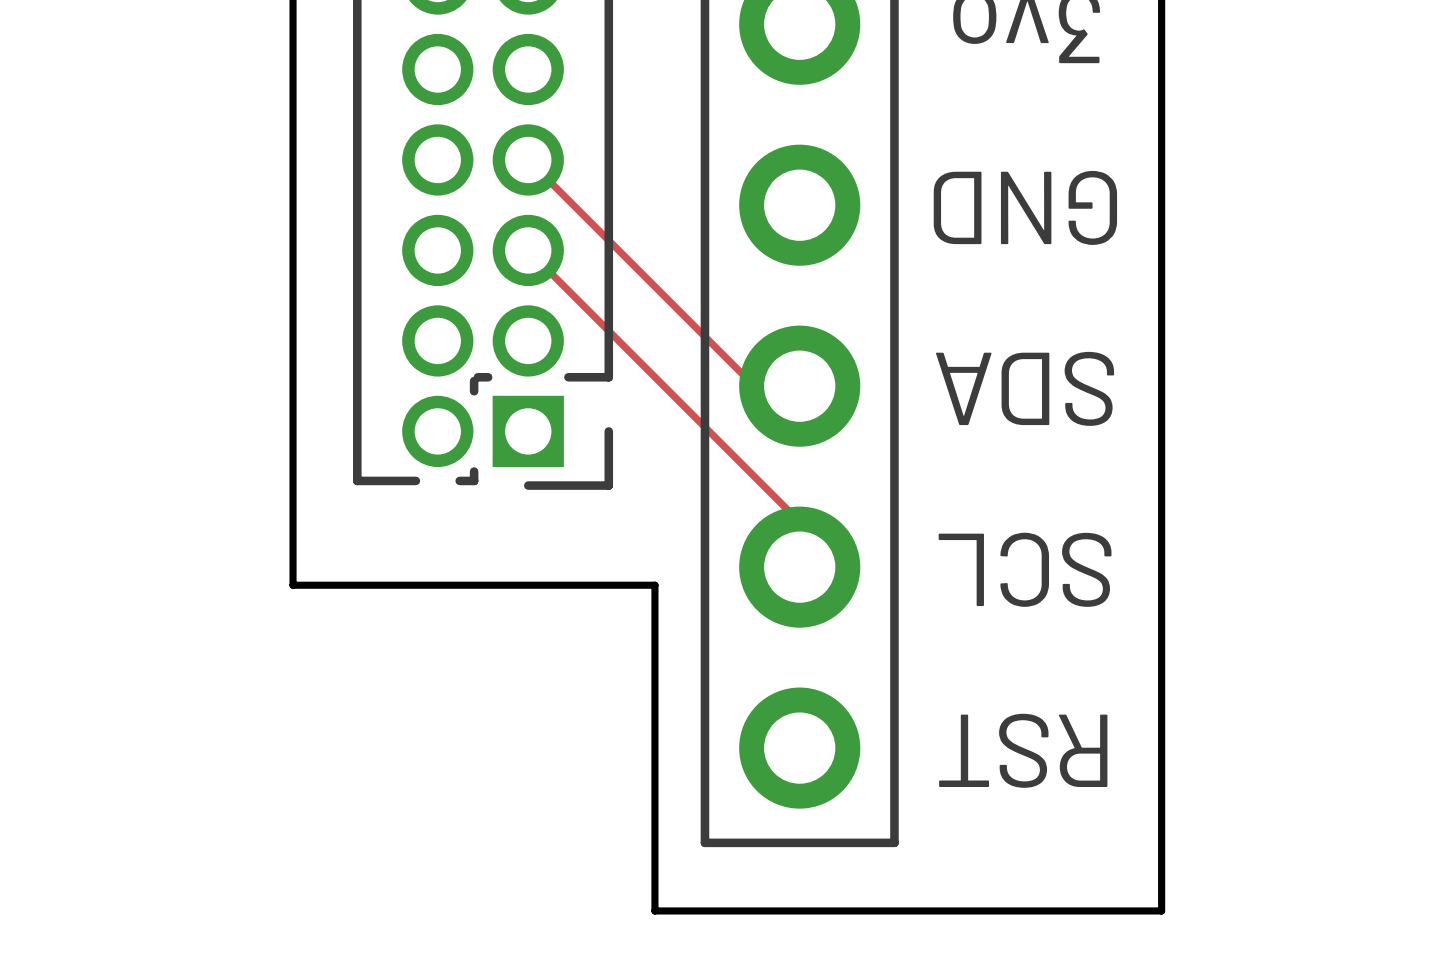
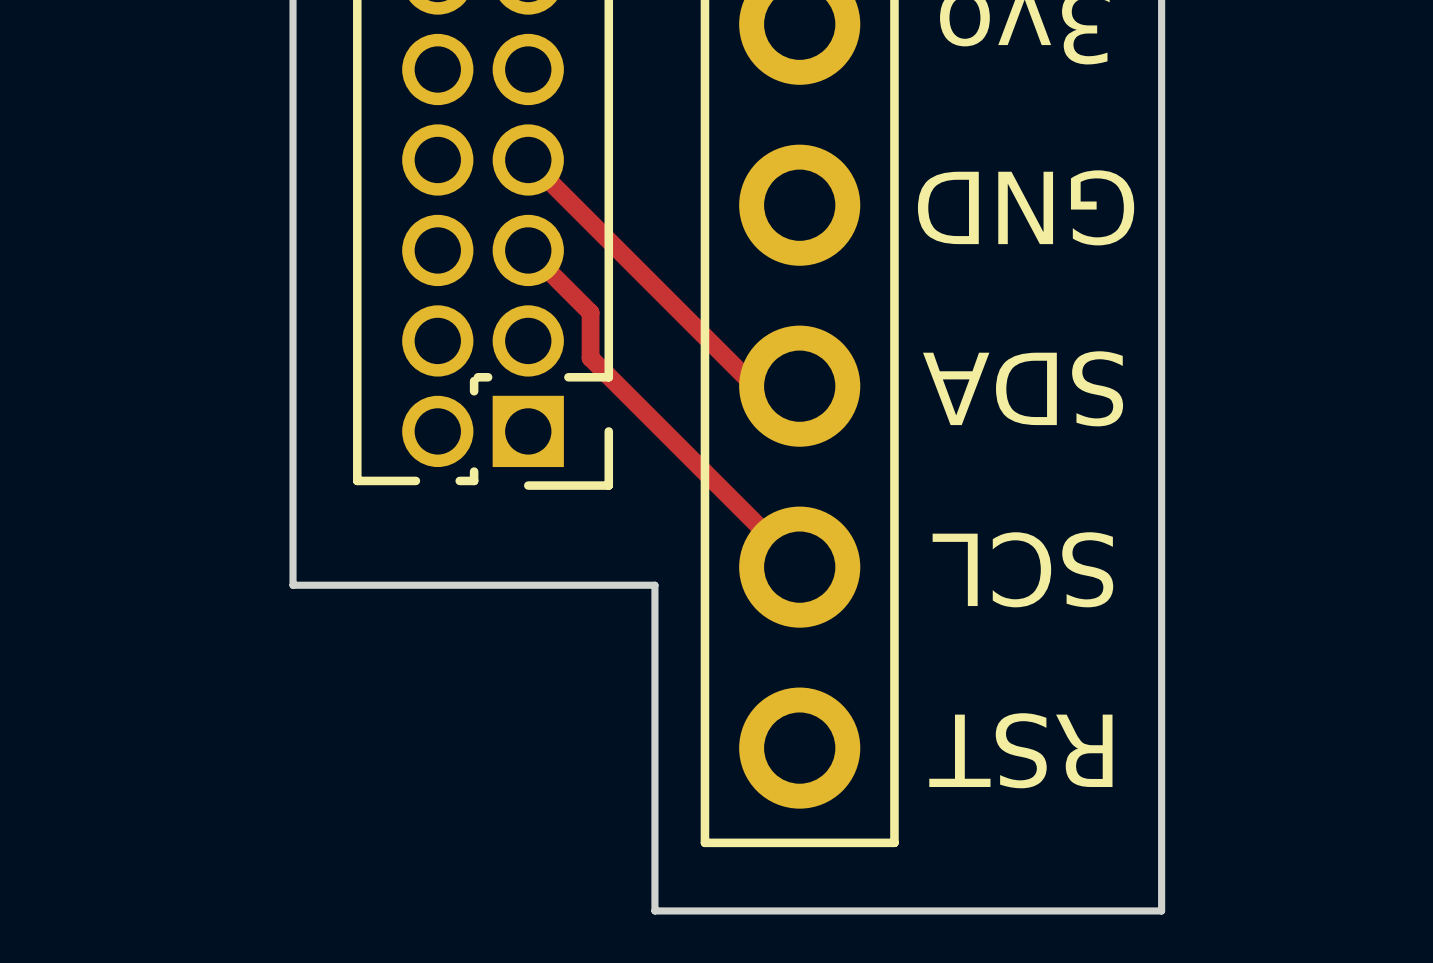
track width: thin (528, 159) (754, 386) (799, 386) -> thick (528, 159) (754, 386) (799, 386)
track width: thin (528, 250) (590, 312) -> thick (528, 250) (590, 312)
track: (590, 312) (799, 521) (799, 567) -> (590, 312) (590, 358) (799, 567)

